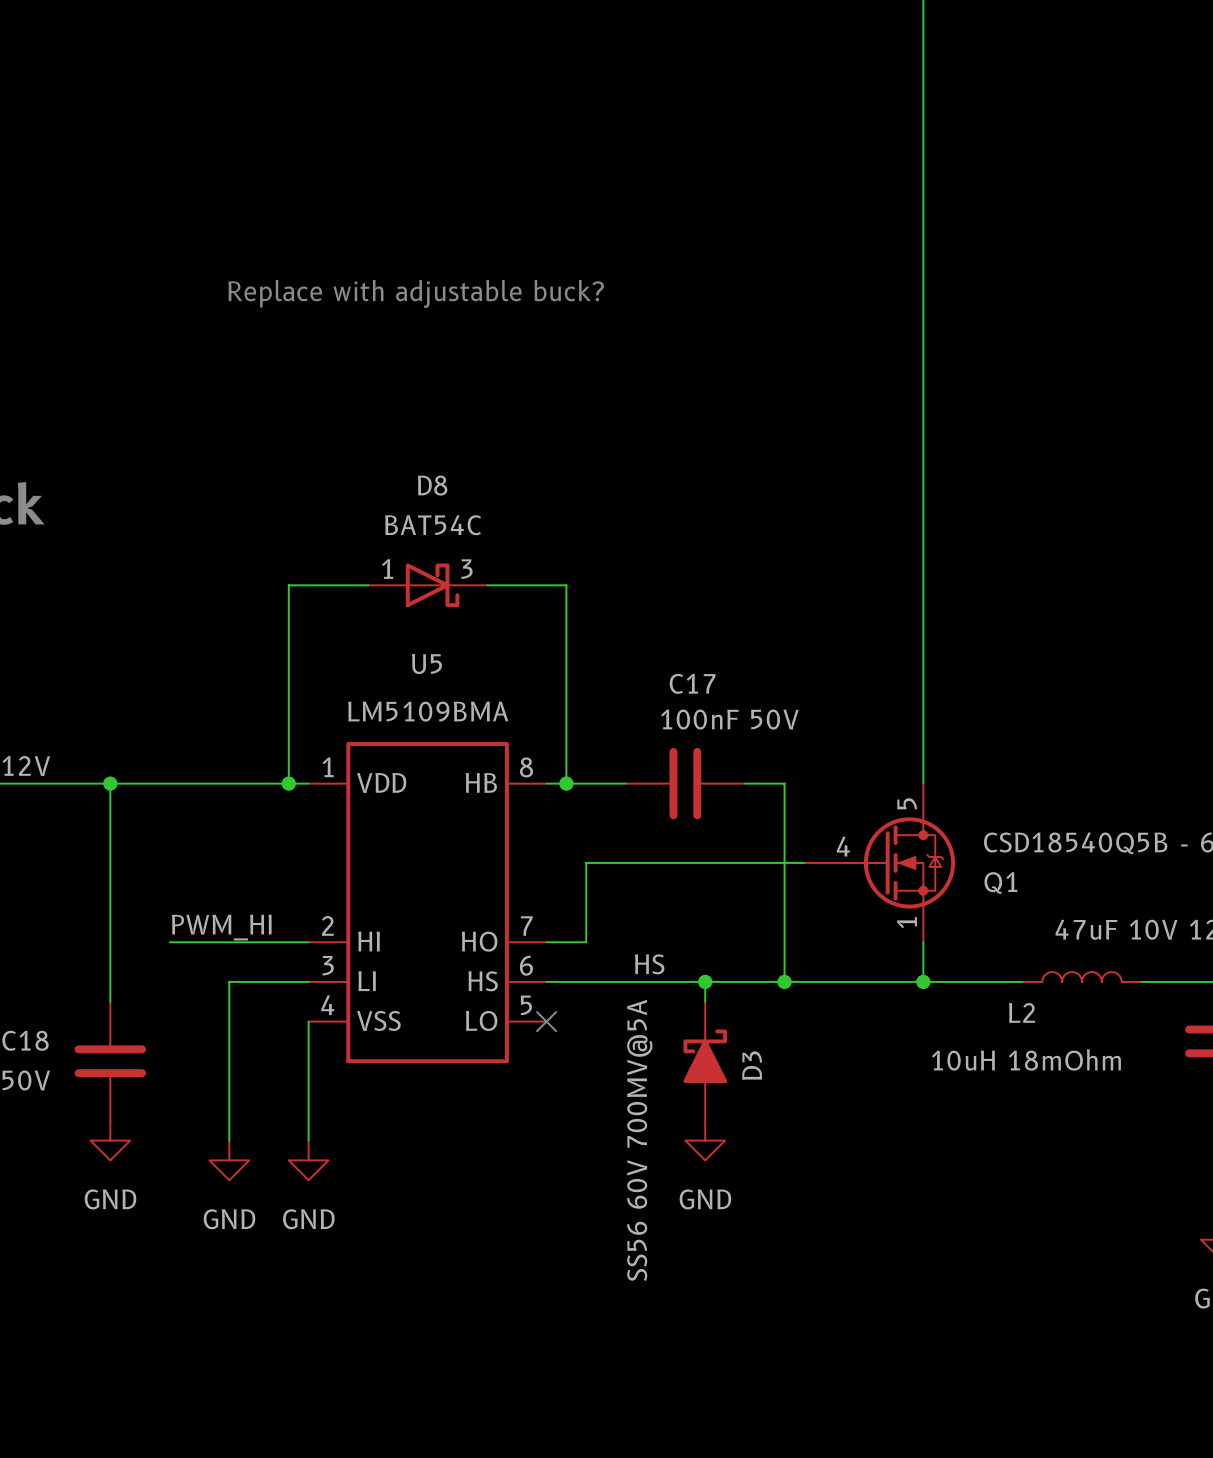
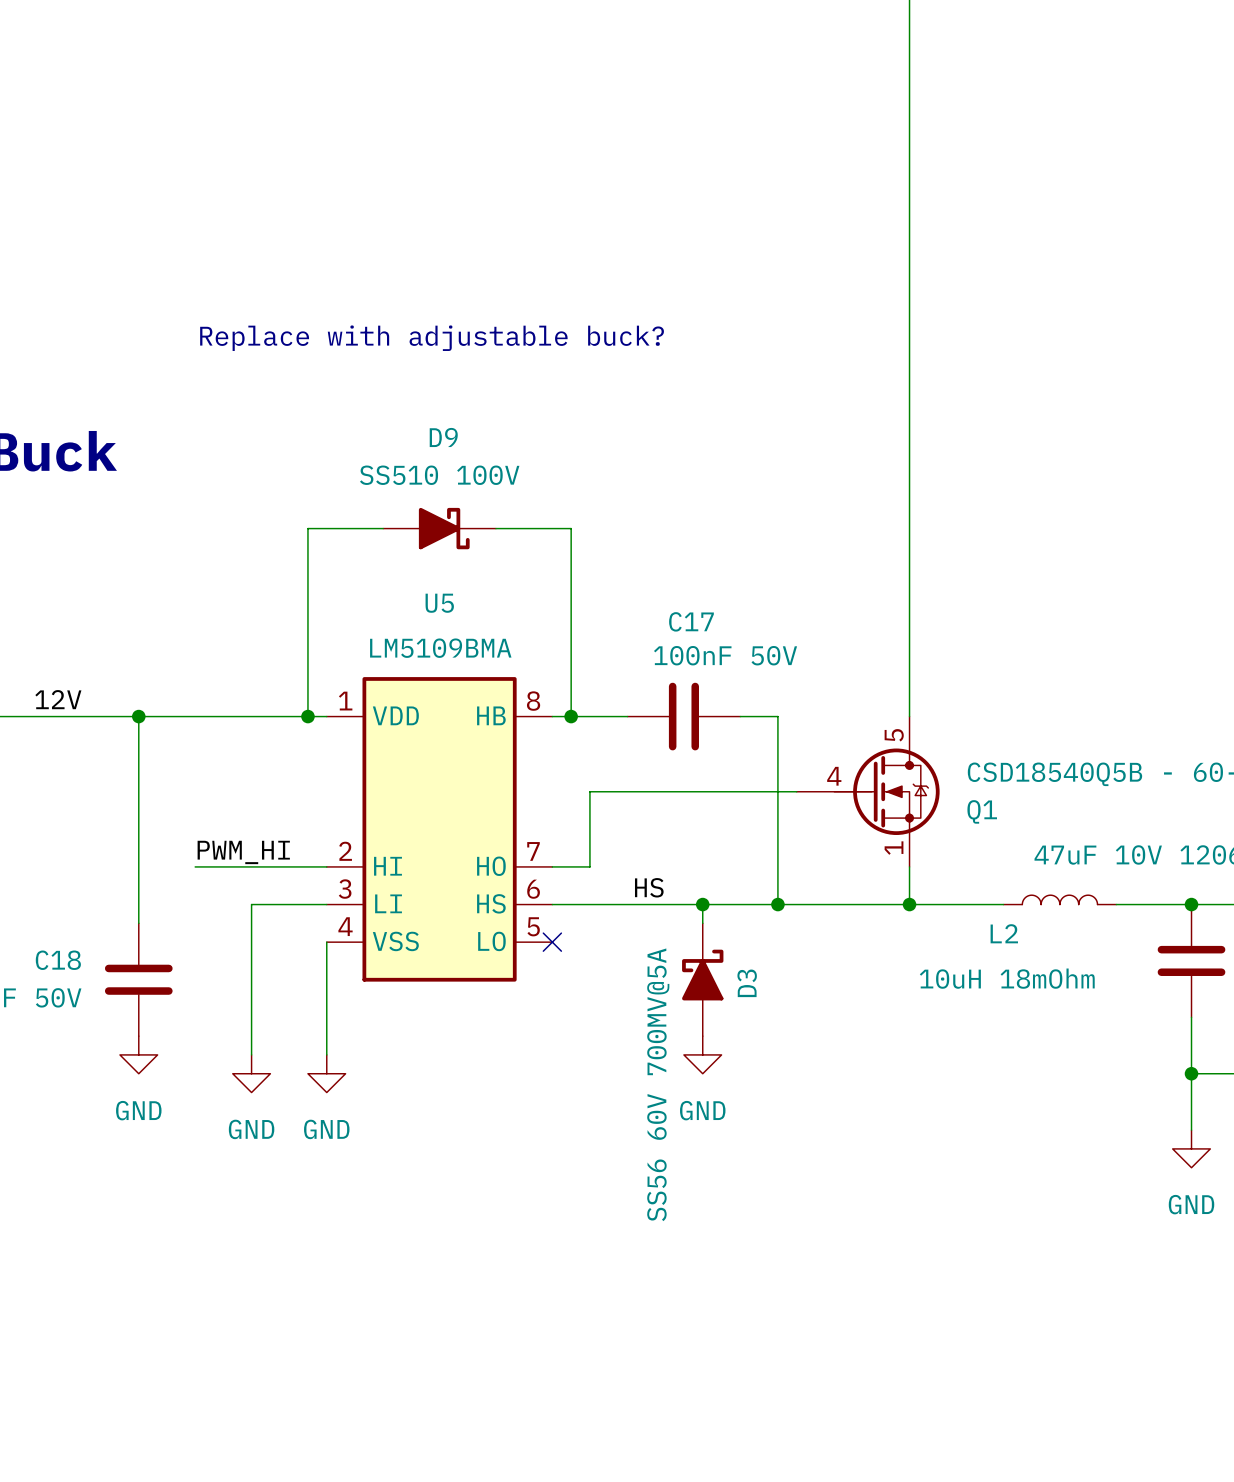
text position: Replace with adjustable buck? (416, 293) -> Replace with adjustable buck? (432, 338)
D8: BAT54C (427, 585) -> none
D9: none -> SS510 100V (439, 528)
D3 value position: SS56 60V 700MV@5A (639, 1140) -> SS56 60V 700MV@5A (658, 1084)

